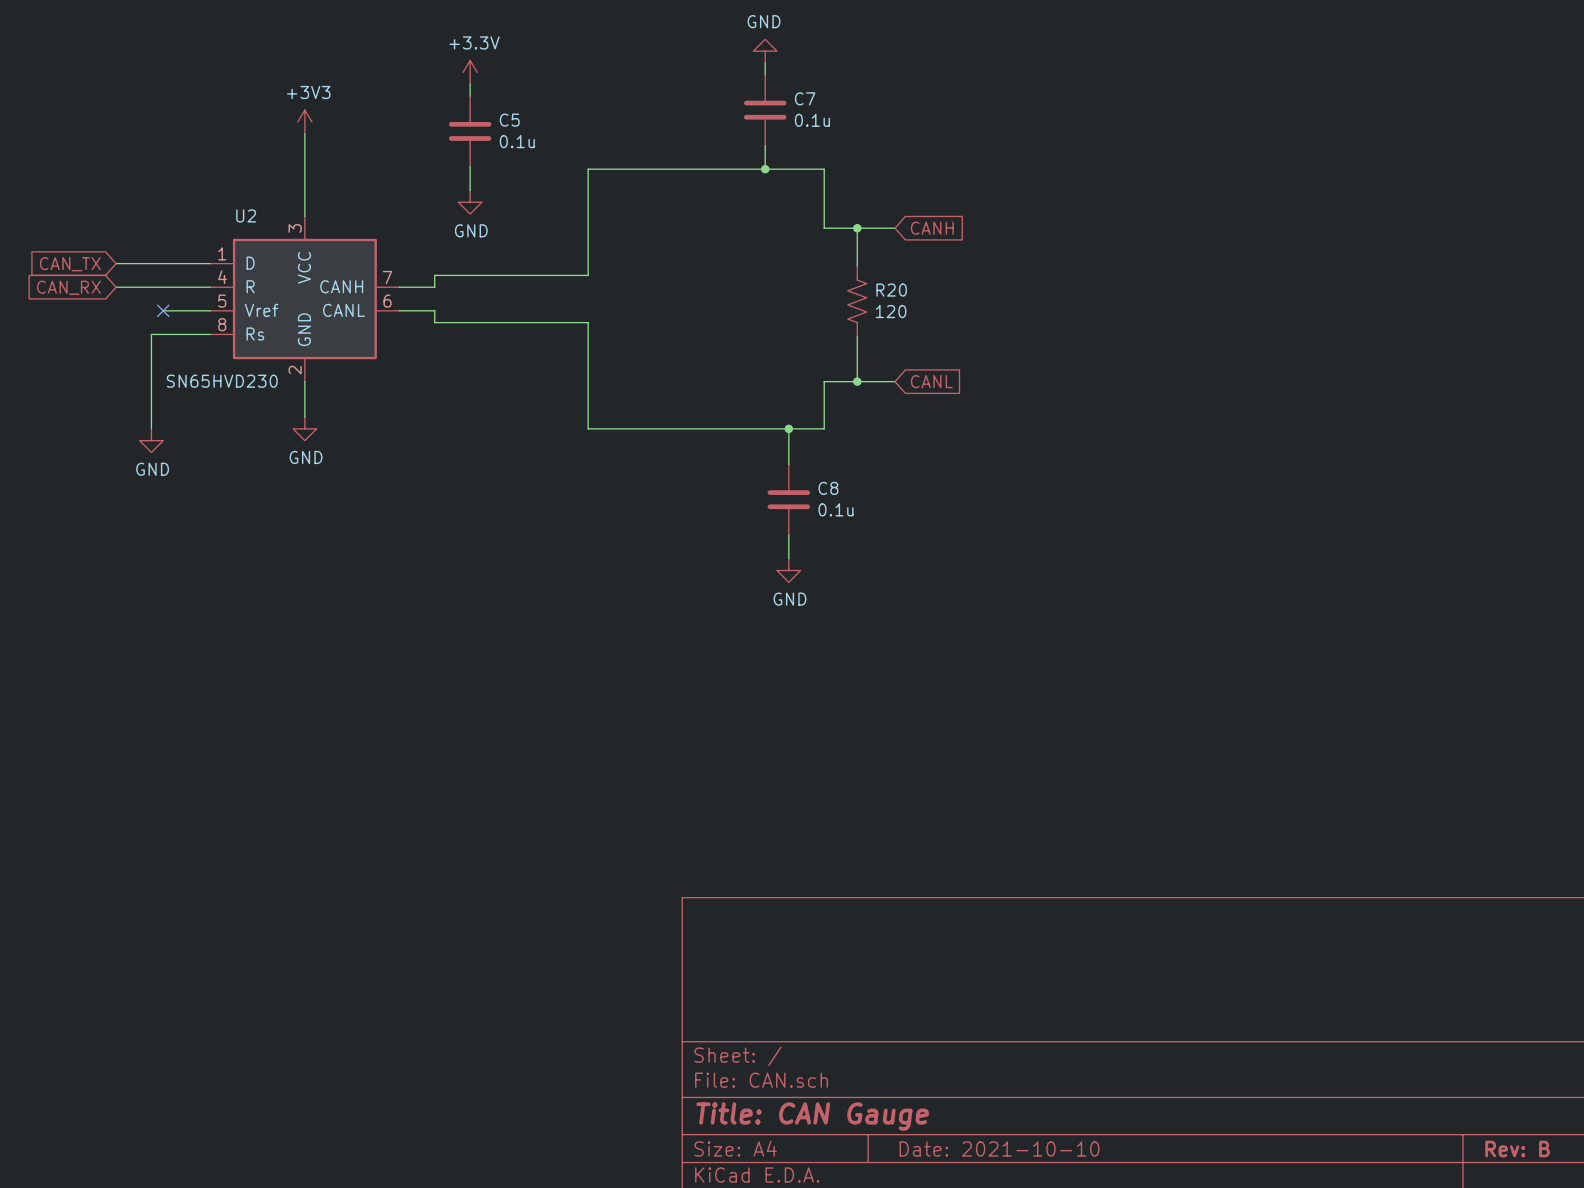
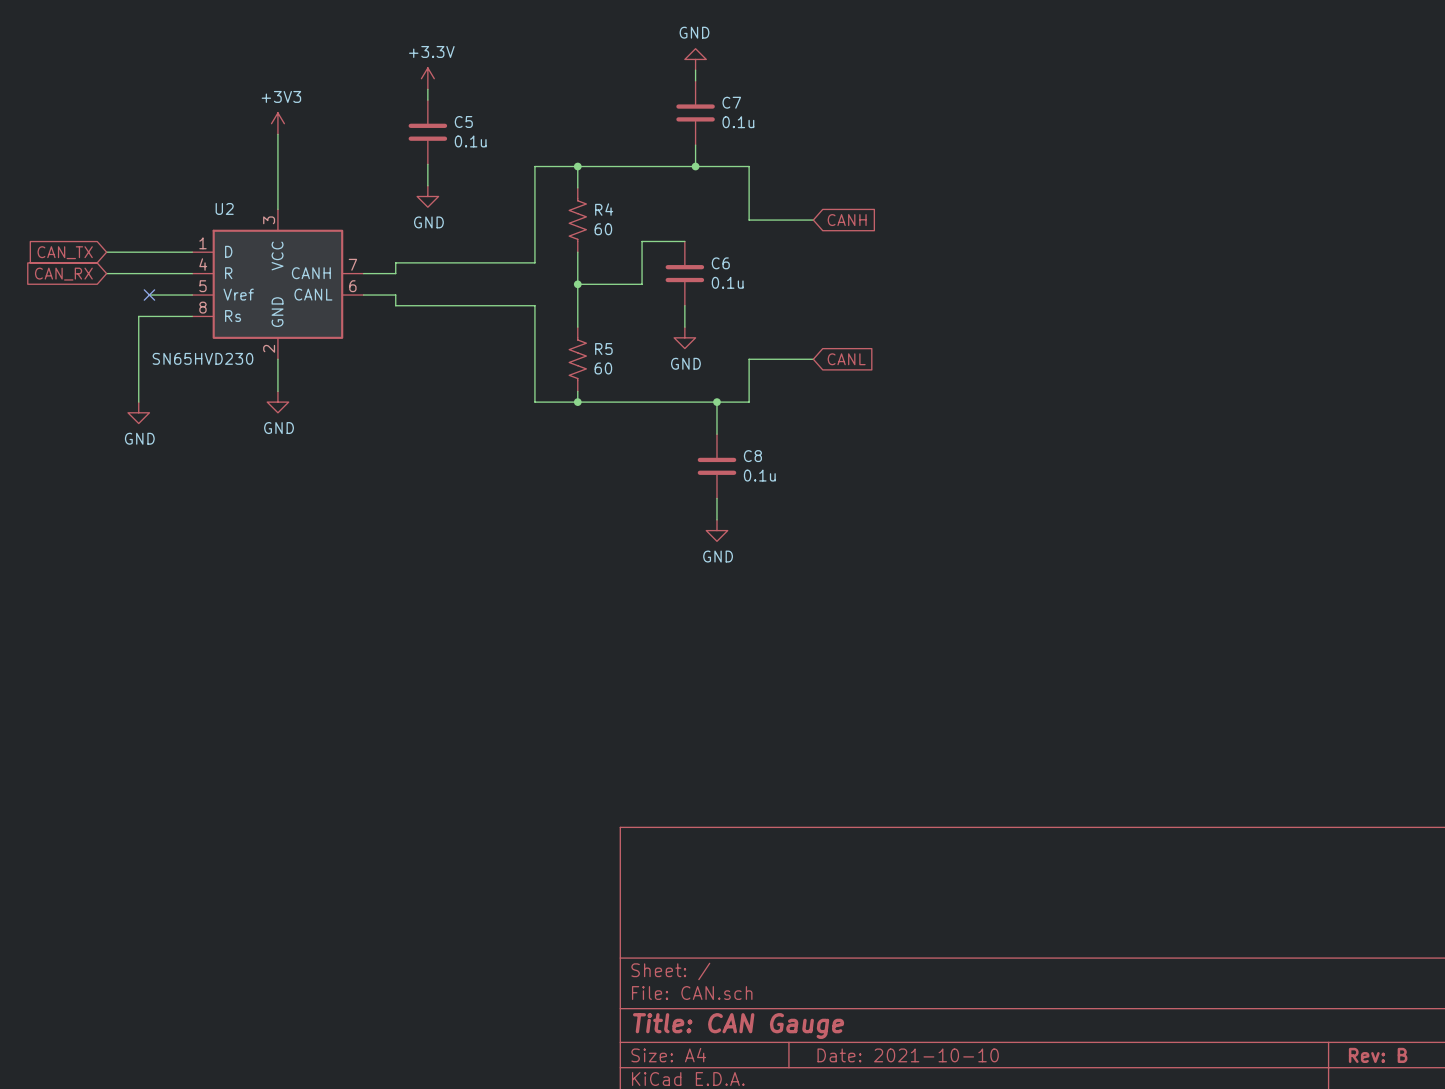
wire: none -> (577, 166) (577, 187)
junction: none -> (577, 166)
R4: none -> 60 (577, 220)
wire: (857, 228) (857, 265) -> none
junction: (857, 228) -> none
wire: none -> (684, 241) (642, 241) (642, 284) (577, 284)
wire: none -> (577, 252) (577, 327)
C6: none -> 0.1u (684, 273)
junction: none -> (577, 284)
R20: 120 (857, 301) -> none
wire: none -> (684, 305) (684, 327)
wire: (857, 336) (857, 381) -> none
power symbol: none -> GND (684, 337)
R5: none -> 60 (577, 359)
junction: (857, 381) -> none
wire: none -> (577, 391) (577, 402)
junction: none -> (577, 402)

